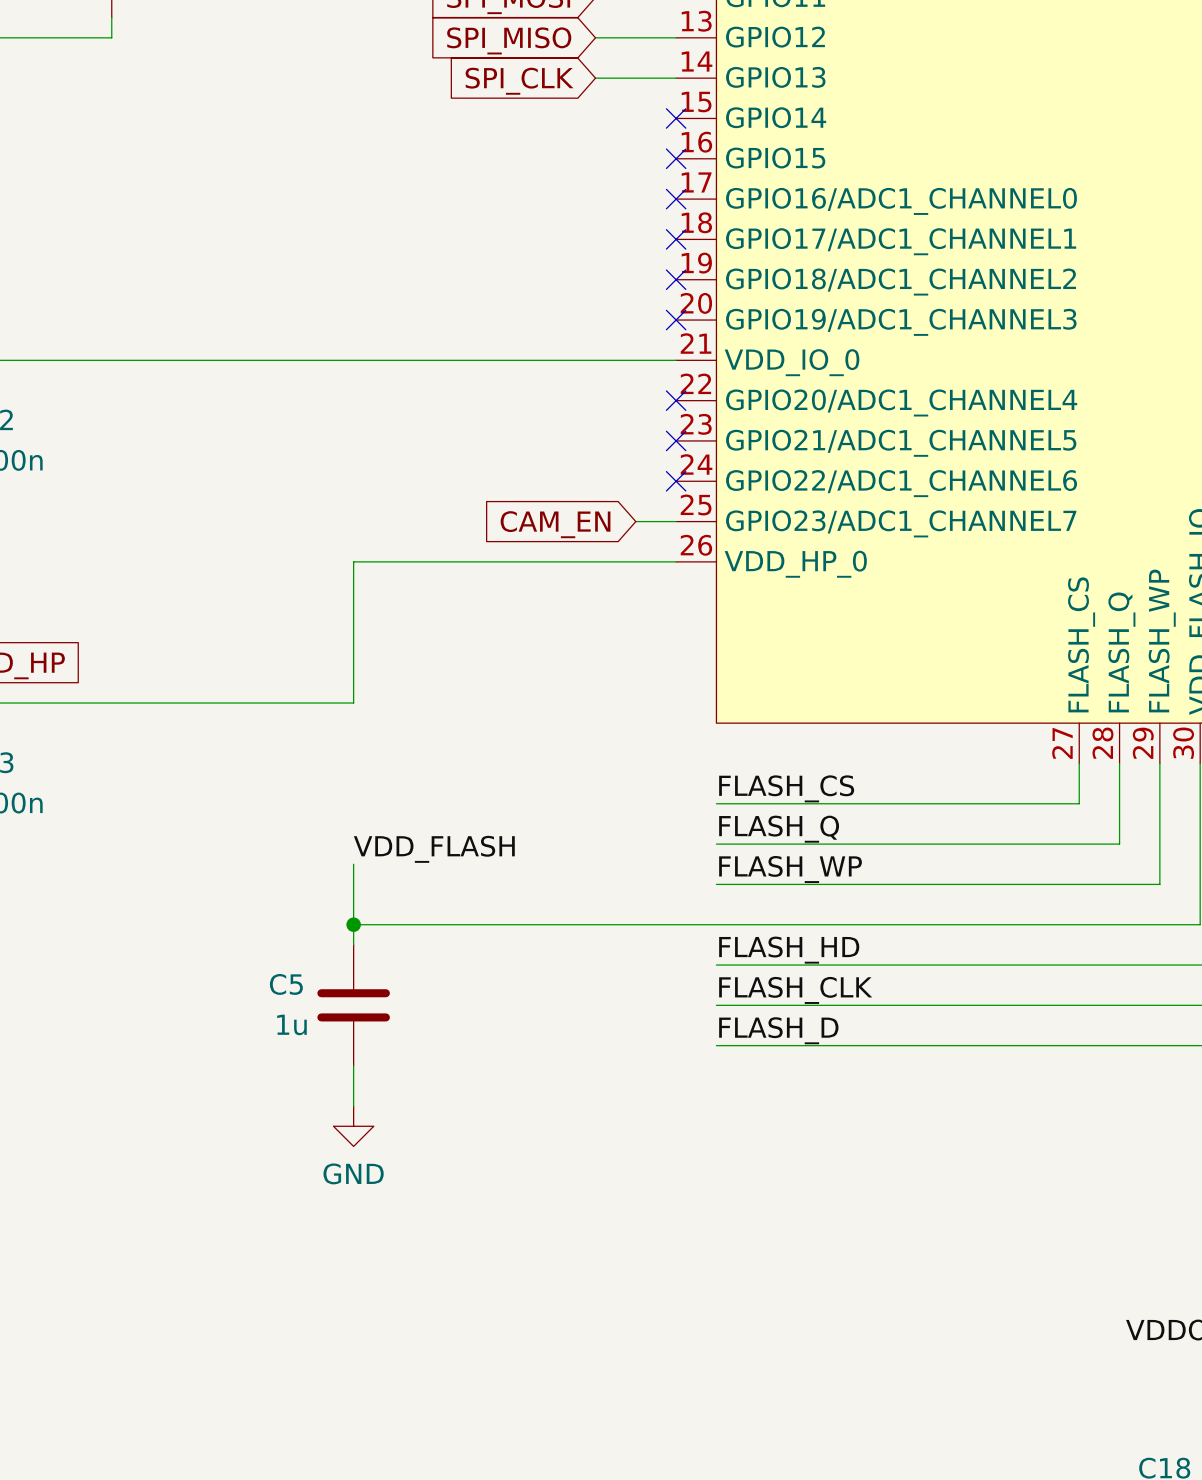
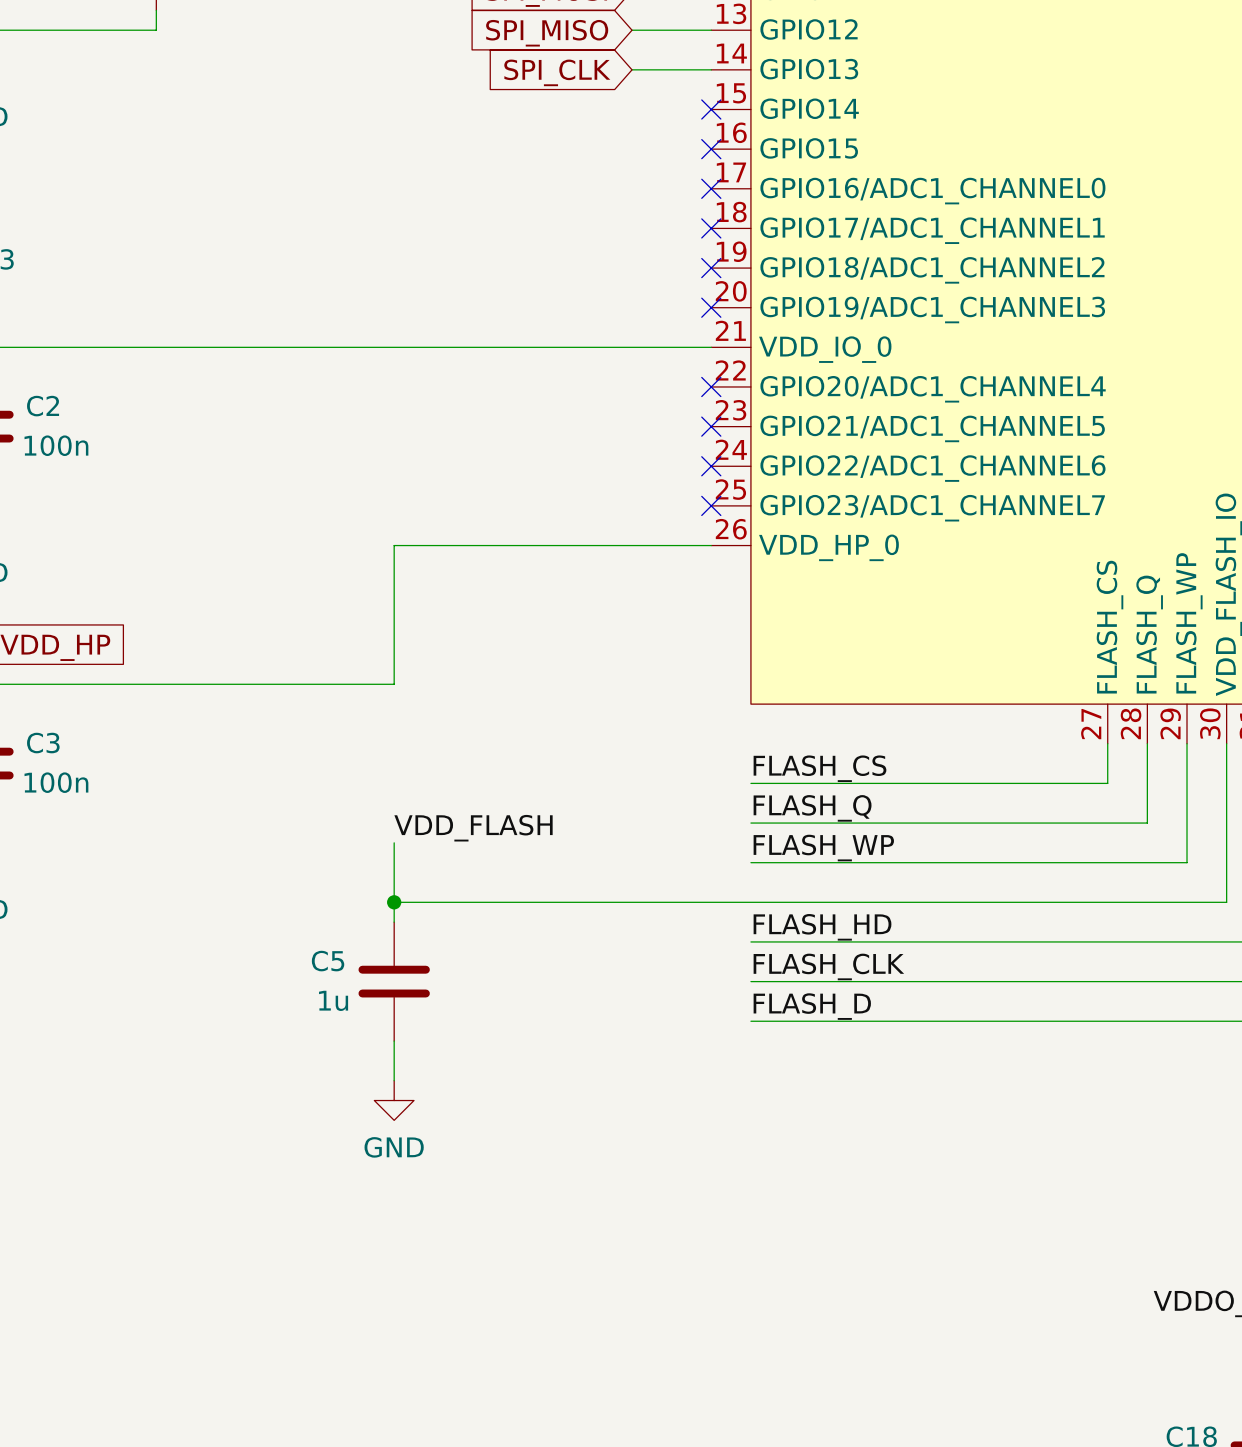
wire: (635, 521) (676, 521) -> none
no-connect mark: none -> (711, 505)
global label: CAM_EN (555, 524) -> none

